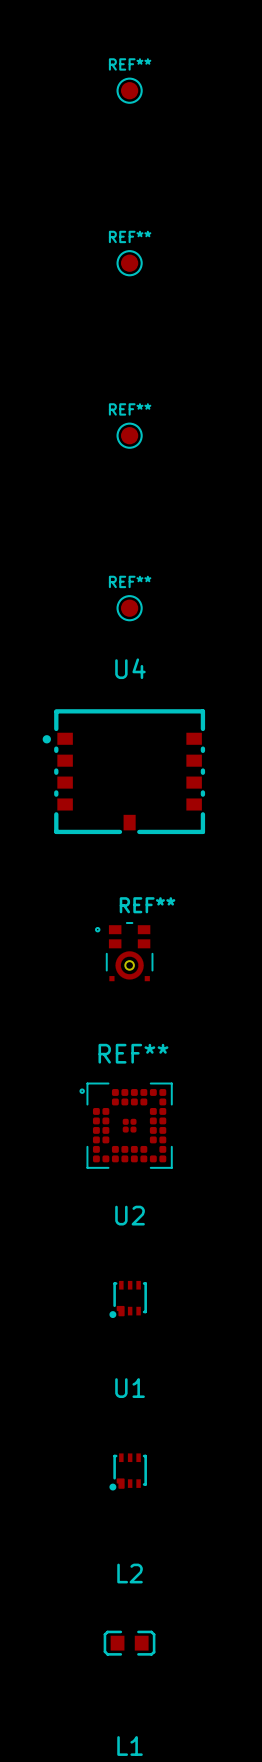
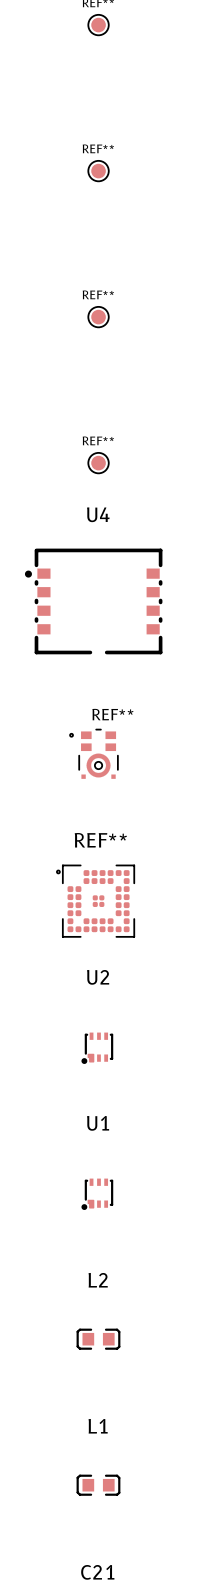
U4 footprint: [42, 709, 206, 835] -> [24, 548, 163, 655]

